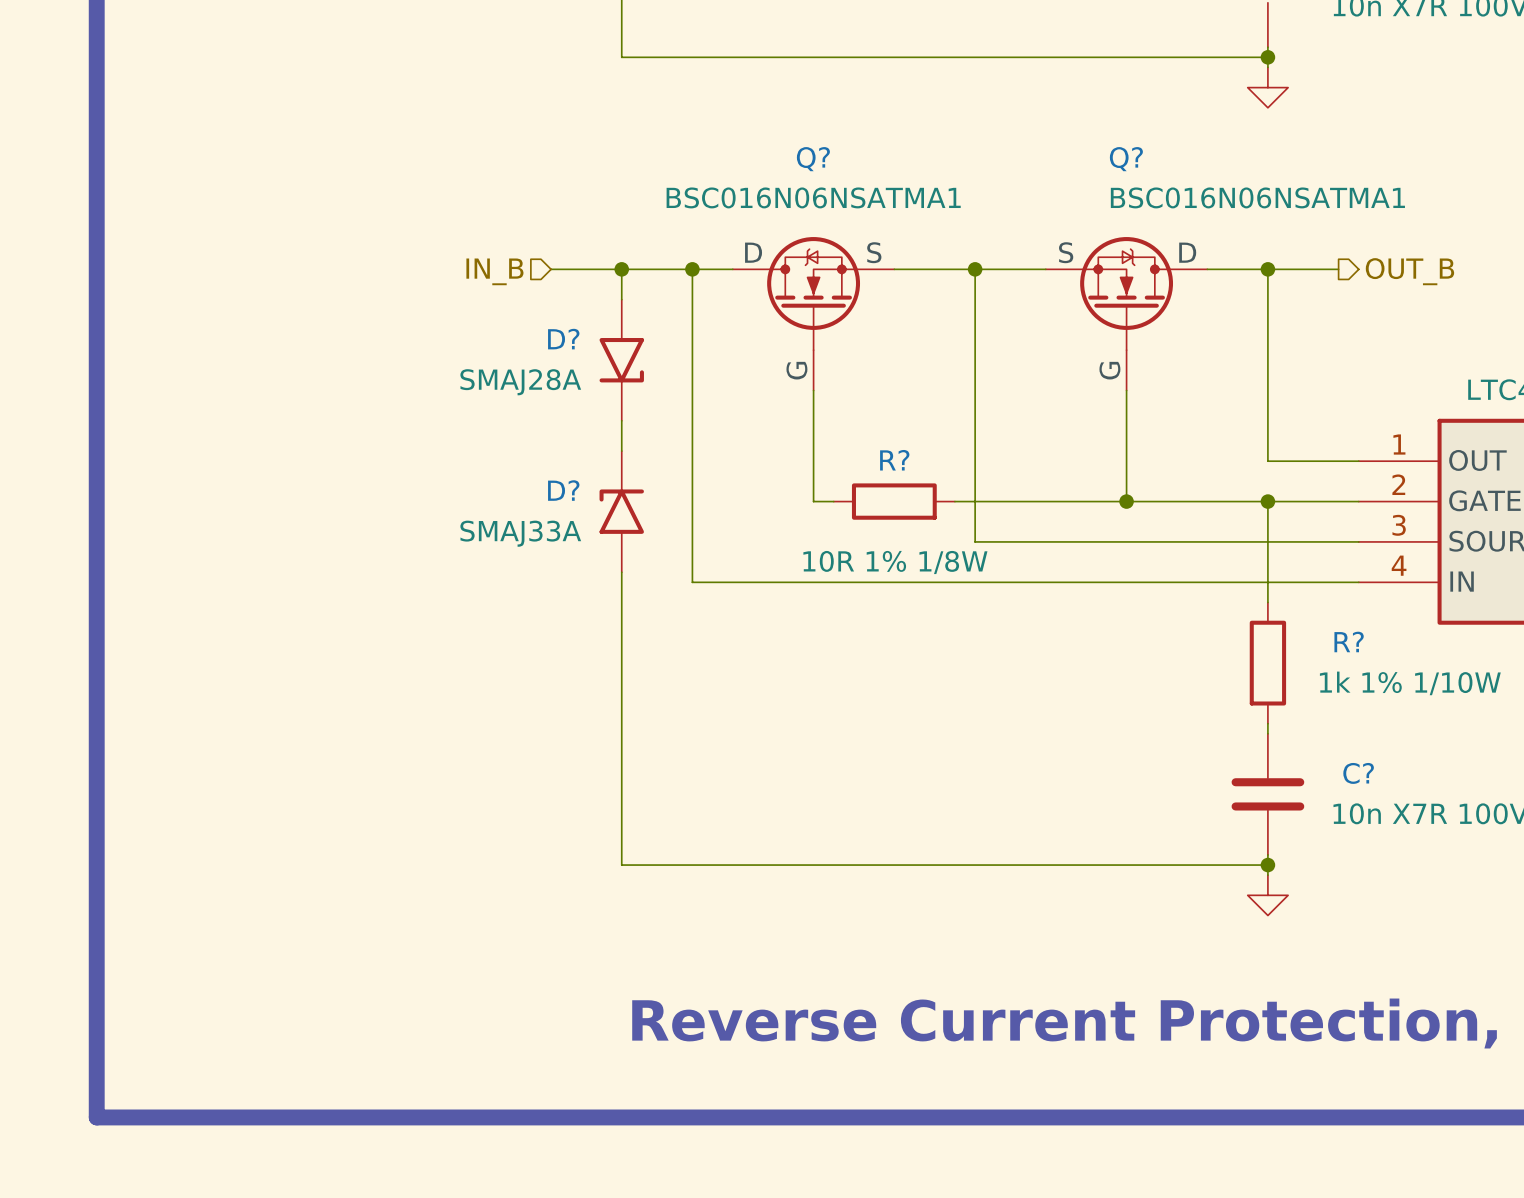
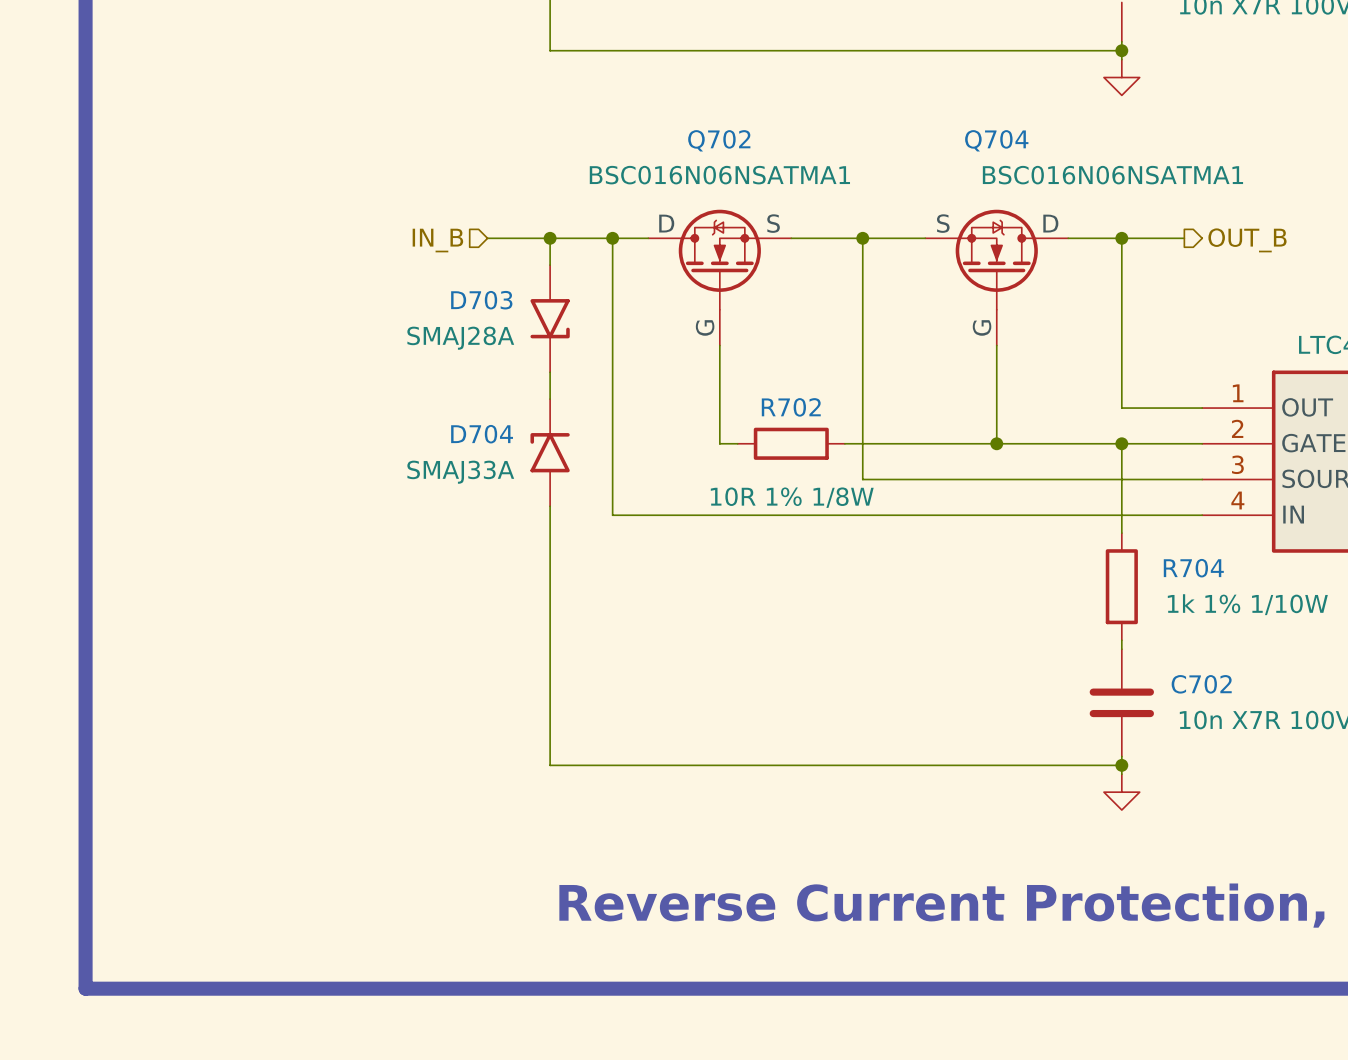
Q? name: Q? (813, 159) -> Q702 (719, 140)
Q? name: Q? (1126, 159) -> Q704 (996, 140)
D? name: D? (563, 339) -> D703 (481, 300)
R? name: R? (894, 460) -> R702 (791, 407)
D? name: D? (563, 490) -> D704 (482, 434)
R? name: R? (1349, 641) -> R704 (1193, 568)
C? name: C? (1358, 773) -> C702 (1201, 684)

